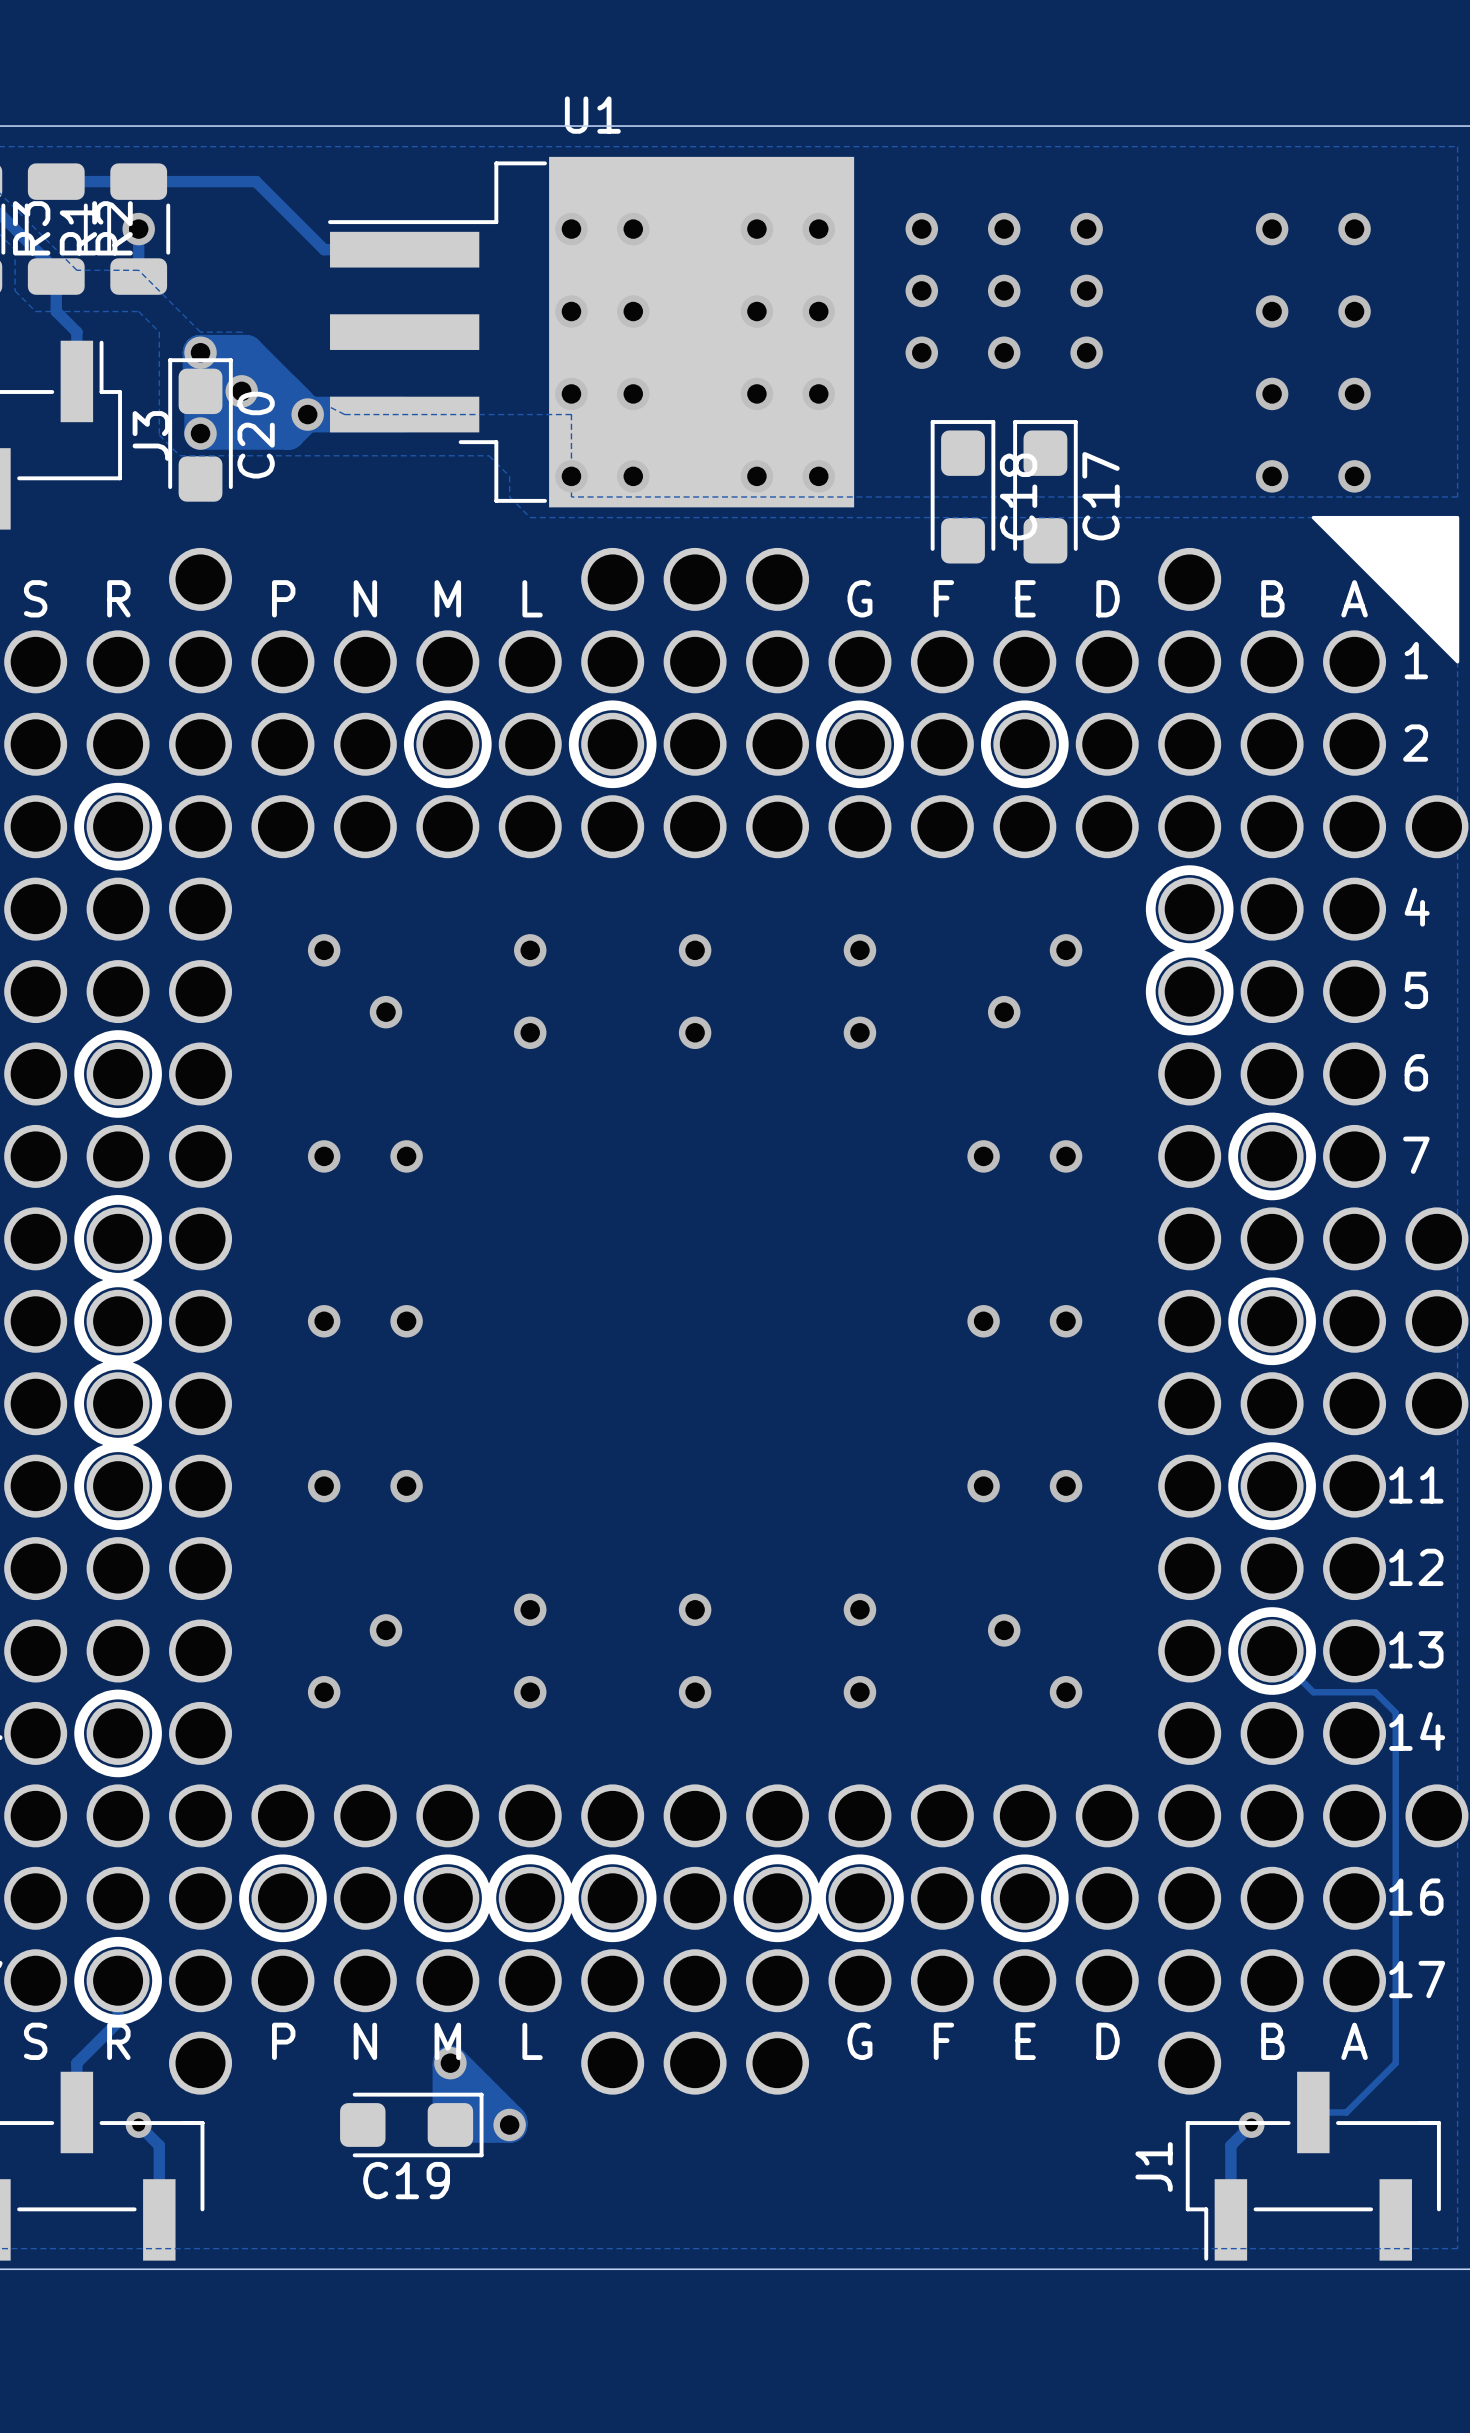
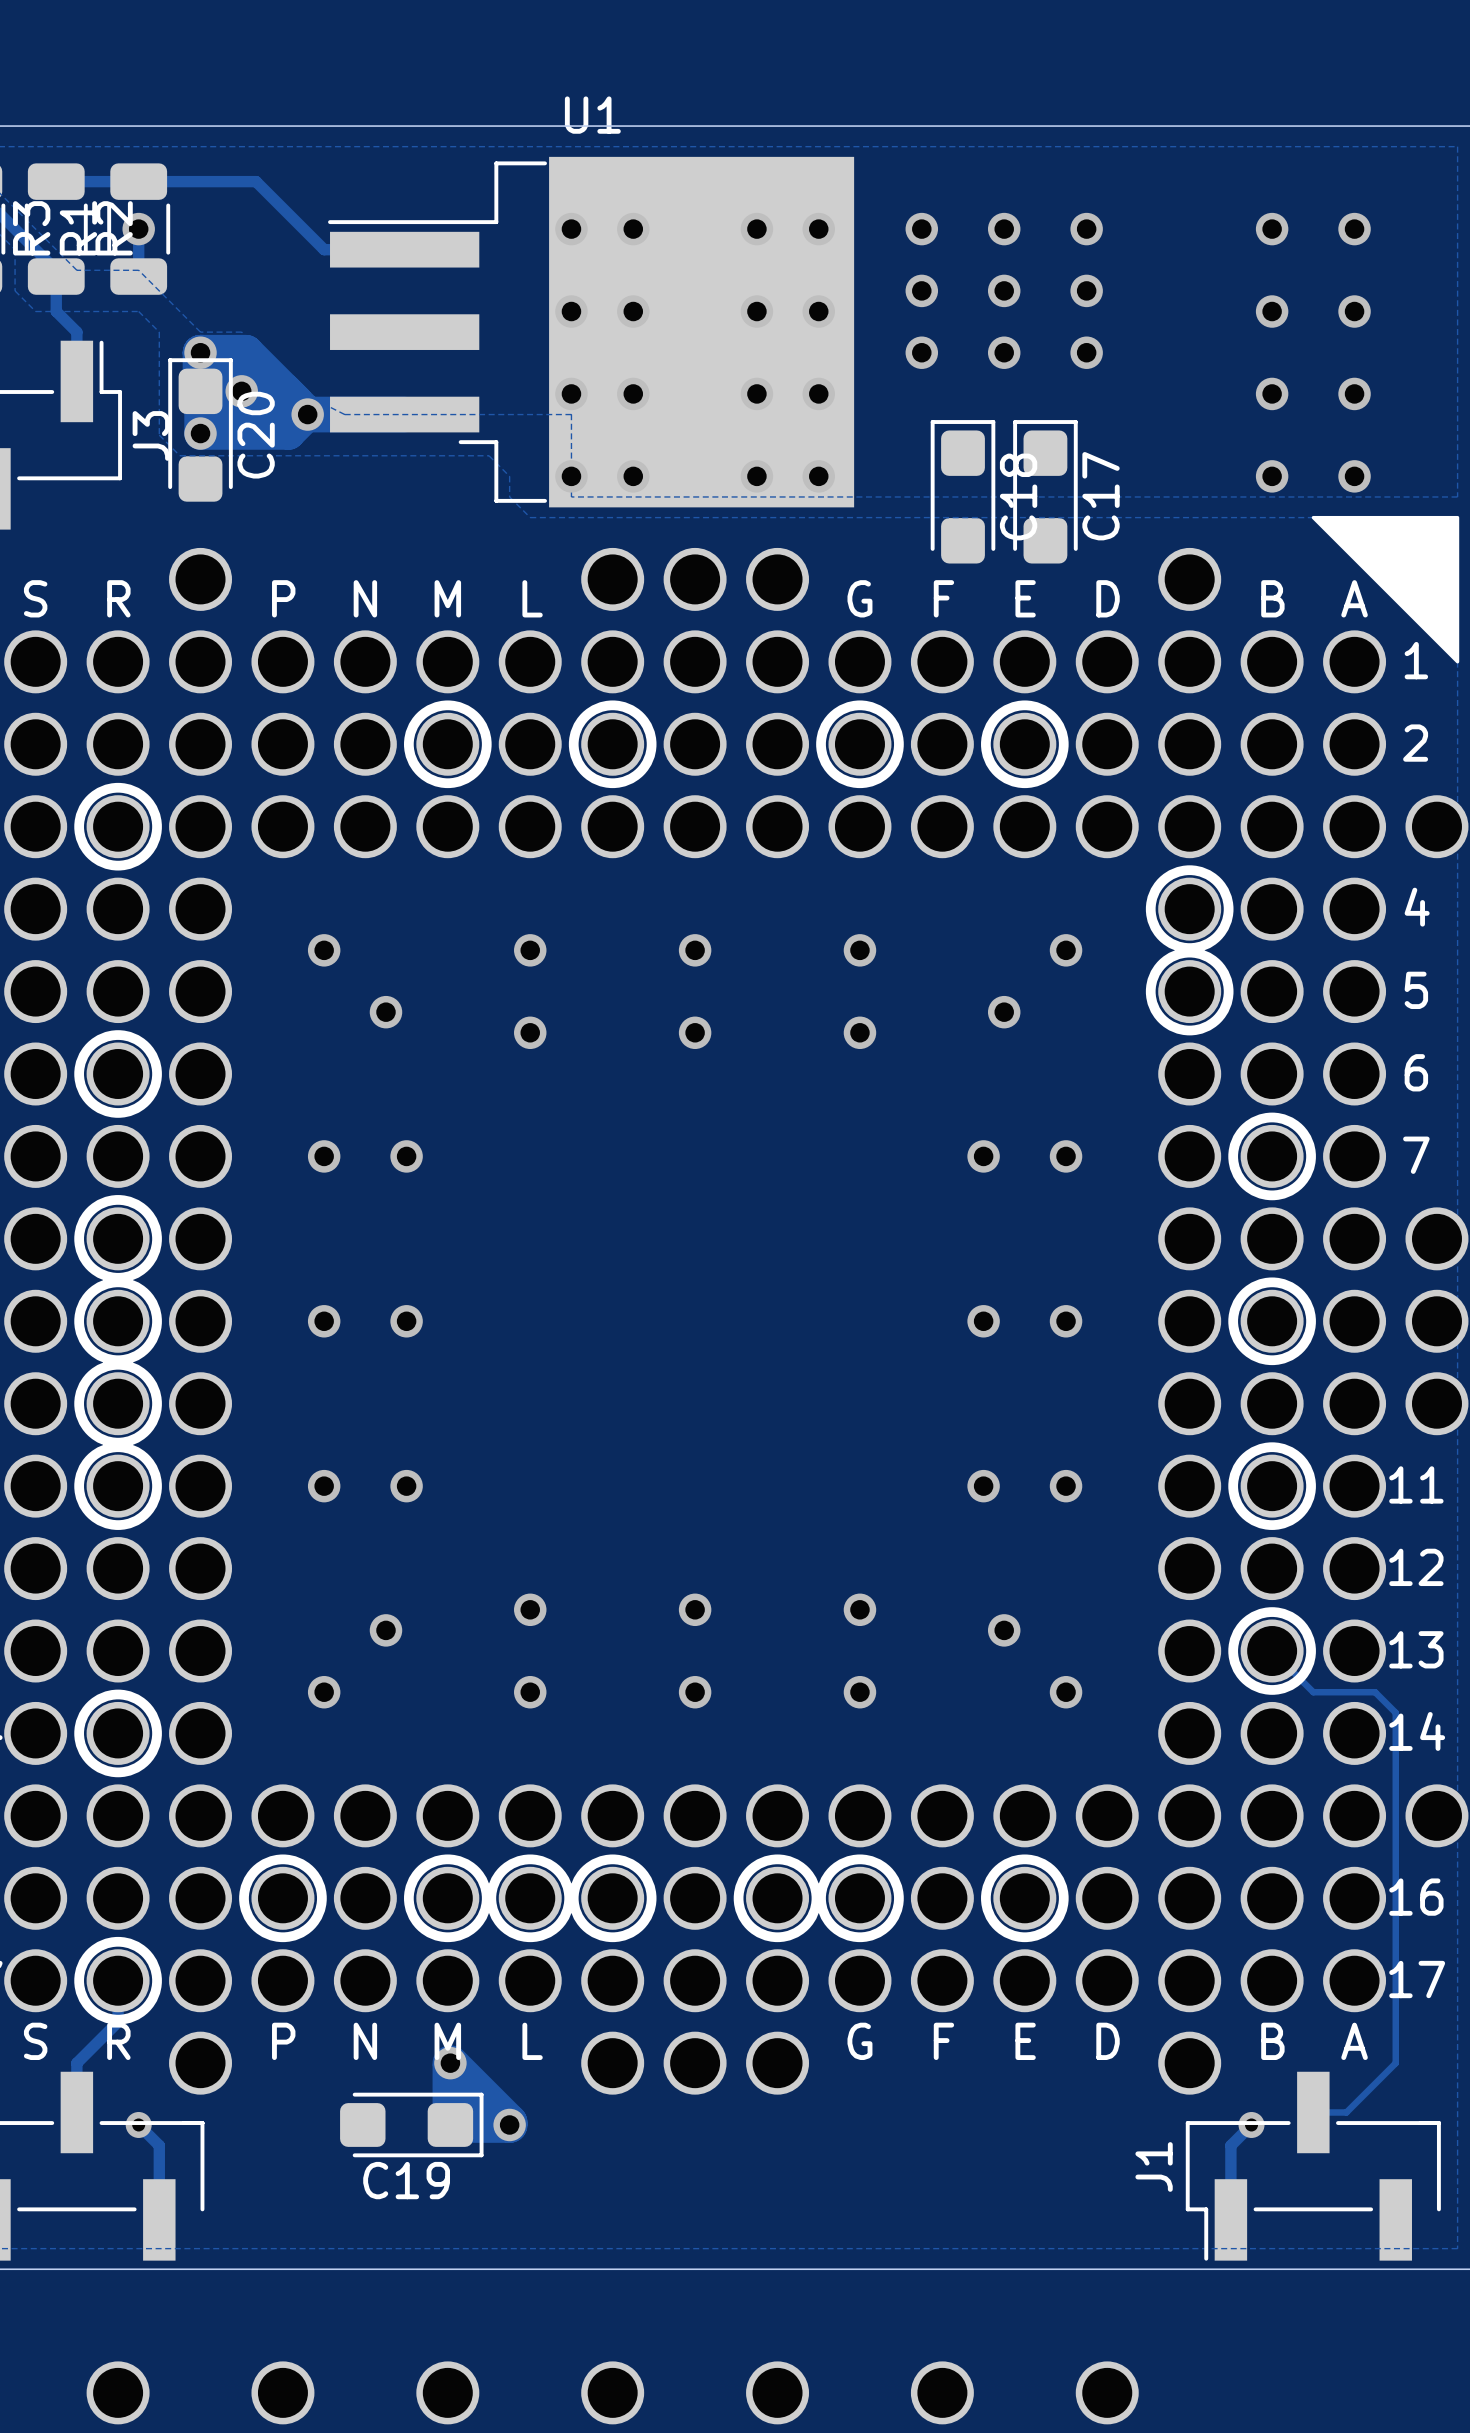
part: none -> (118, 2392)
part: none -> (282, 2392)
part: none -> (447, 2392)
part: none -> (612, 2392)
part: none -> (777, 2392)
part: none -> (942, 2392)
part: none -> (1107, 2392)

